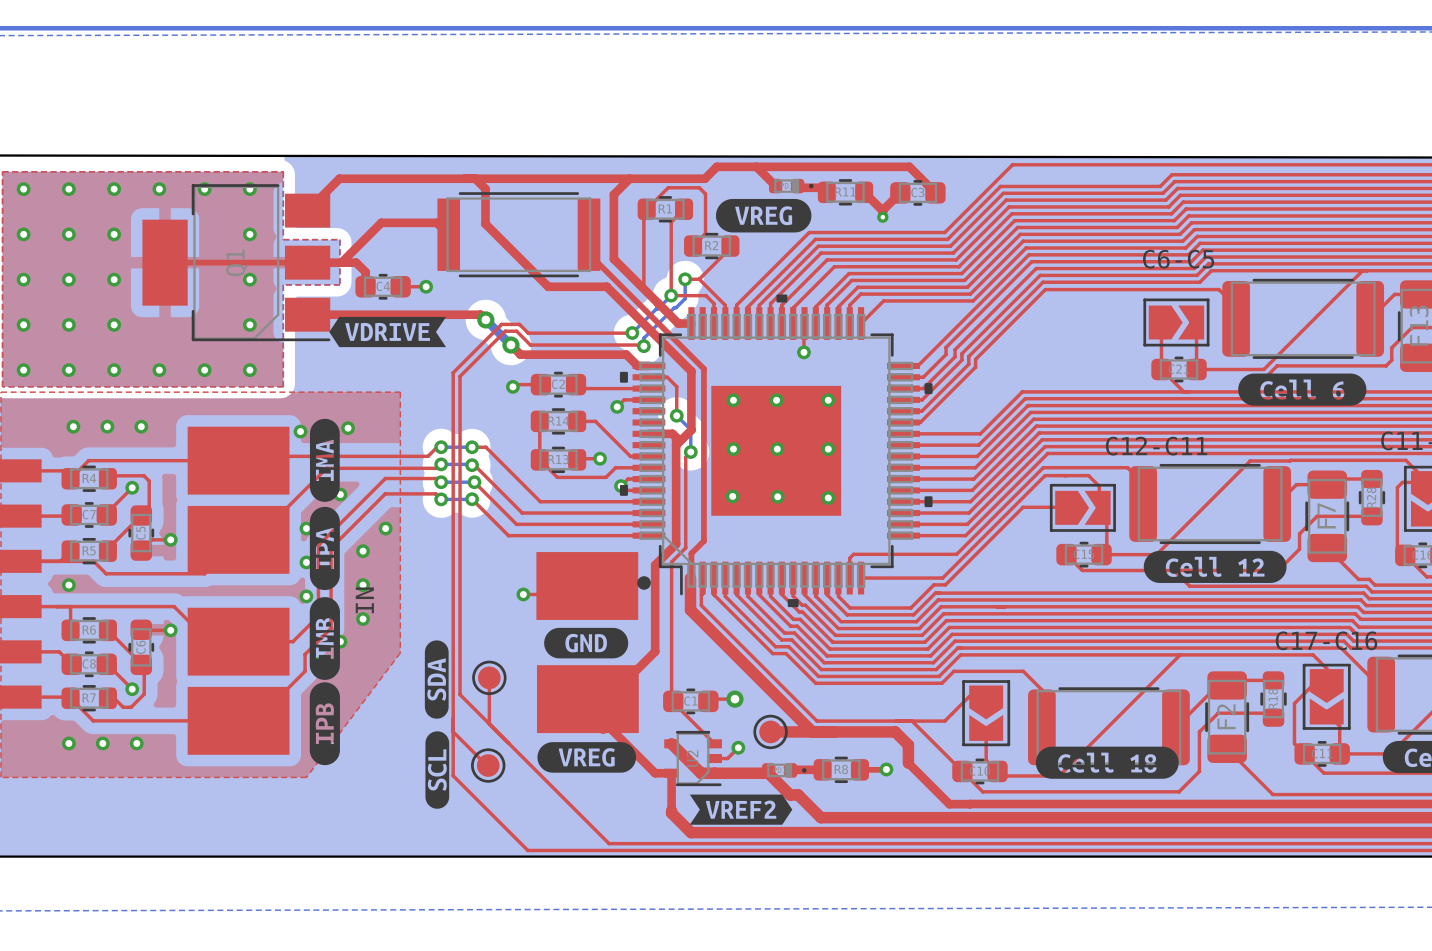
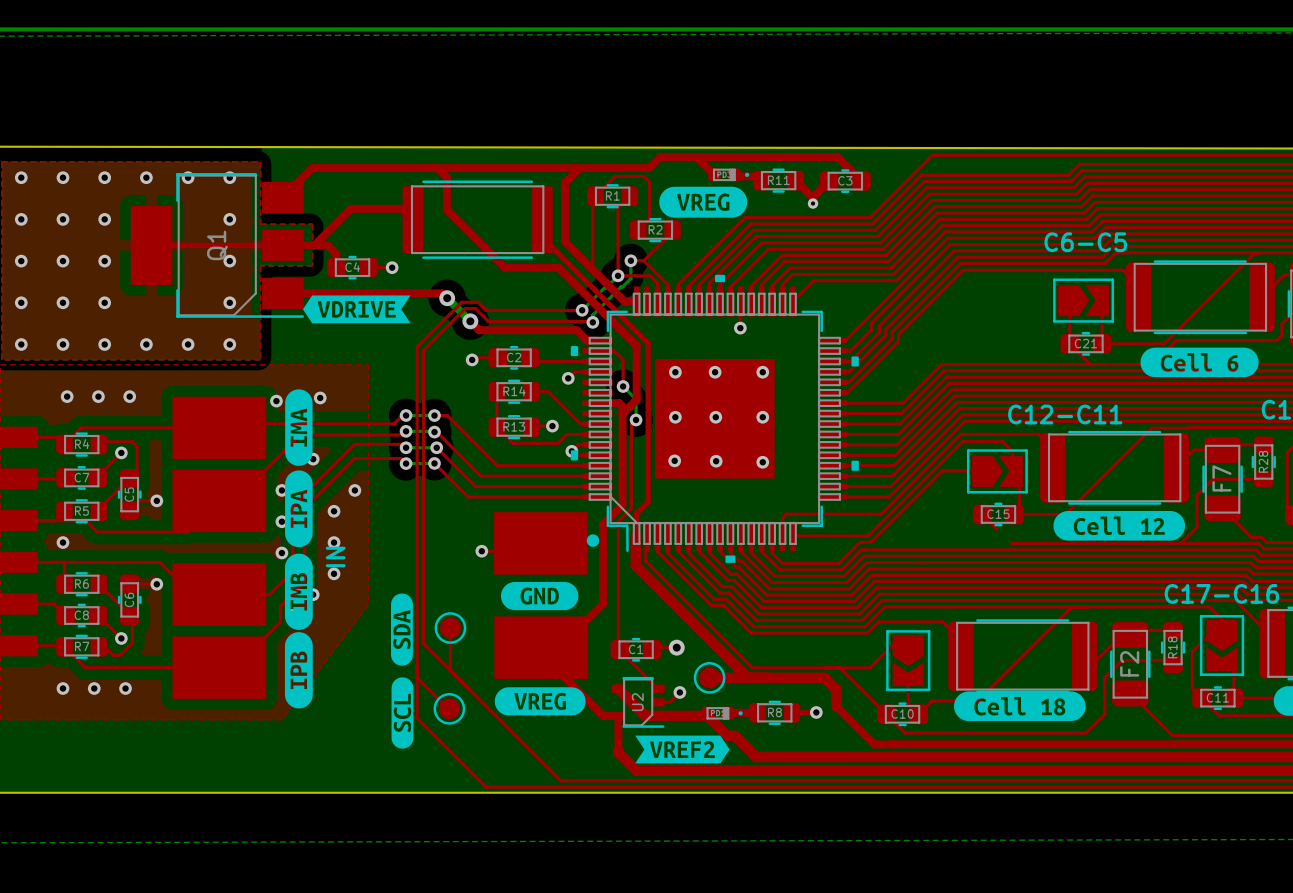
top track: (1299, 549) (1278, 570) (1082, 570) -> (1197, 509) (1197, 527) (1180, 543)
top track: (1189, 586) (1366, 586) -> (1011, 543) (1258, 543)
top track: (1180, 654) (1059, 775) (1002, 775) (997, 771) -> (1072, 606) (977, 701) (931, 701) (918, 714)
part position: (1108, 727) -> (1022, 656)

